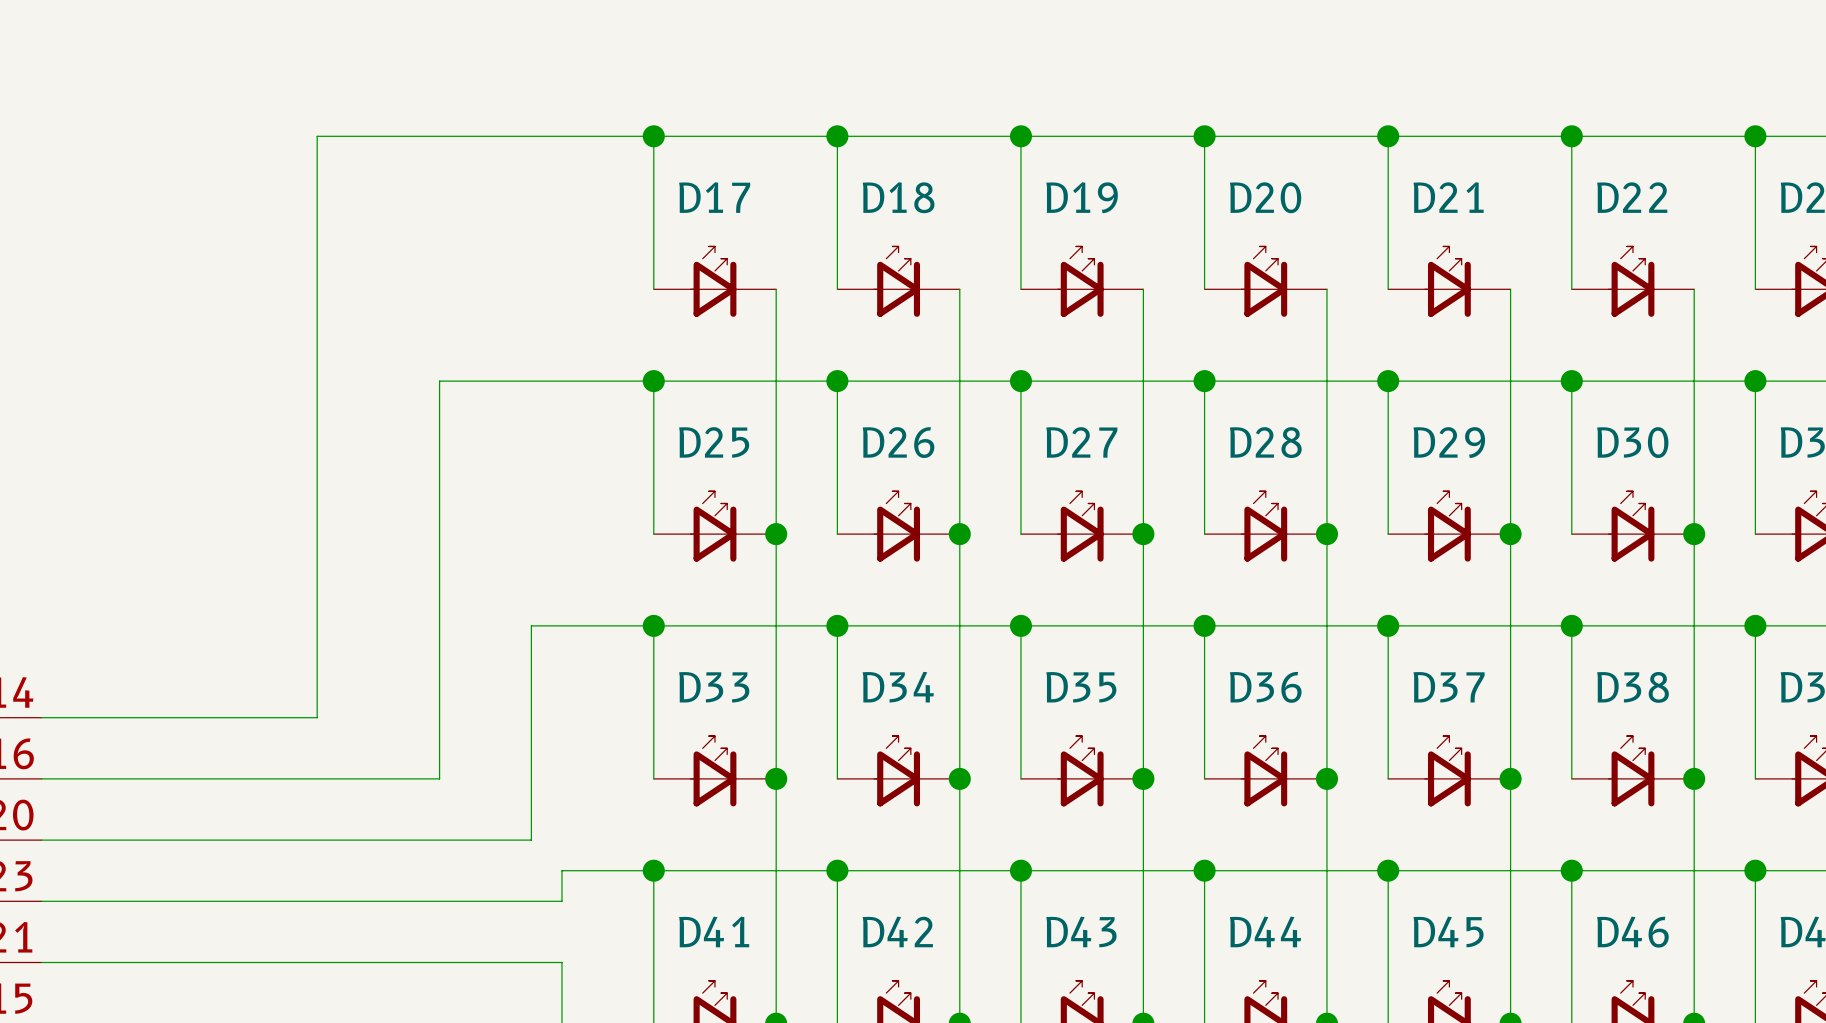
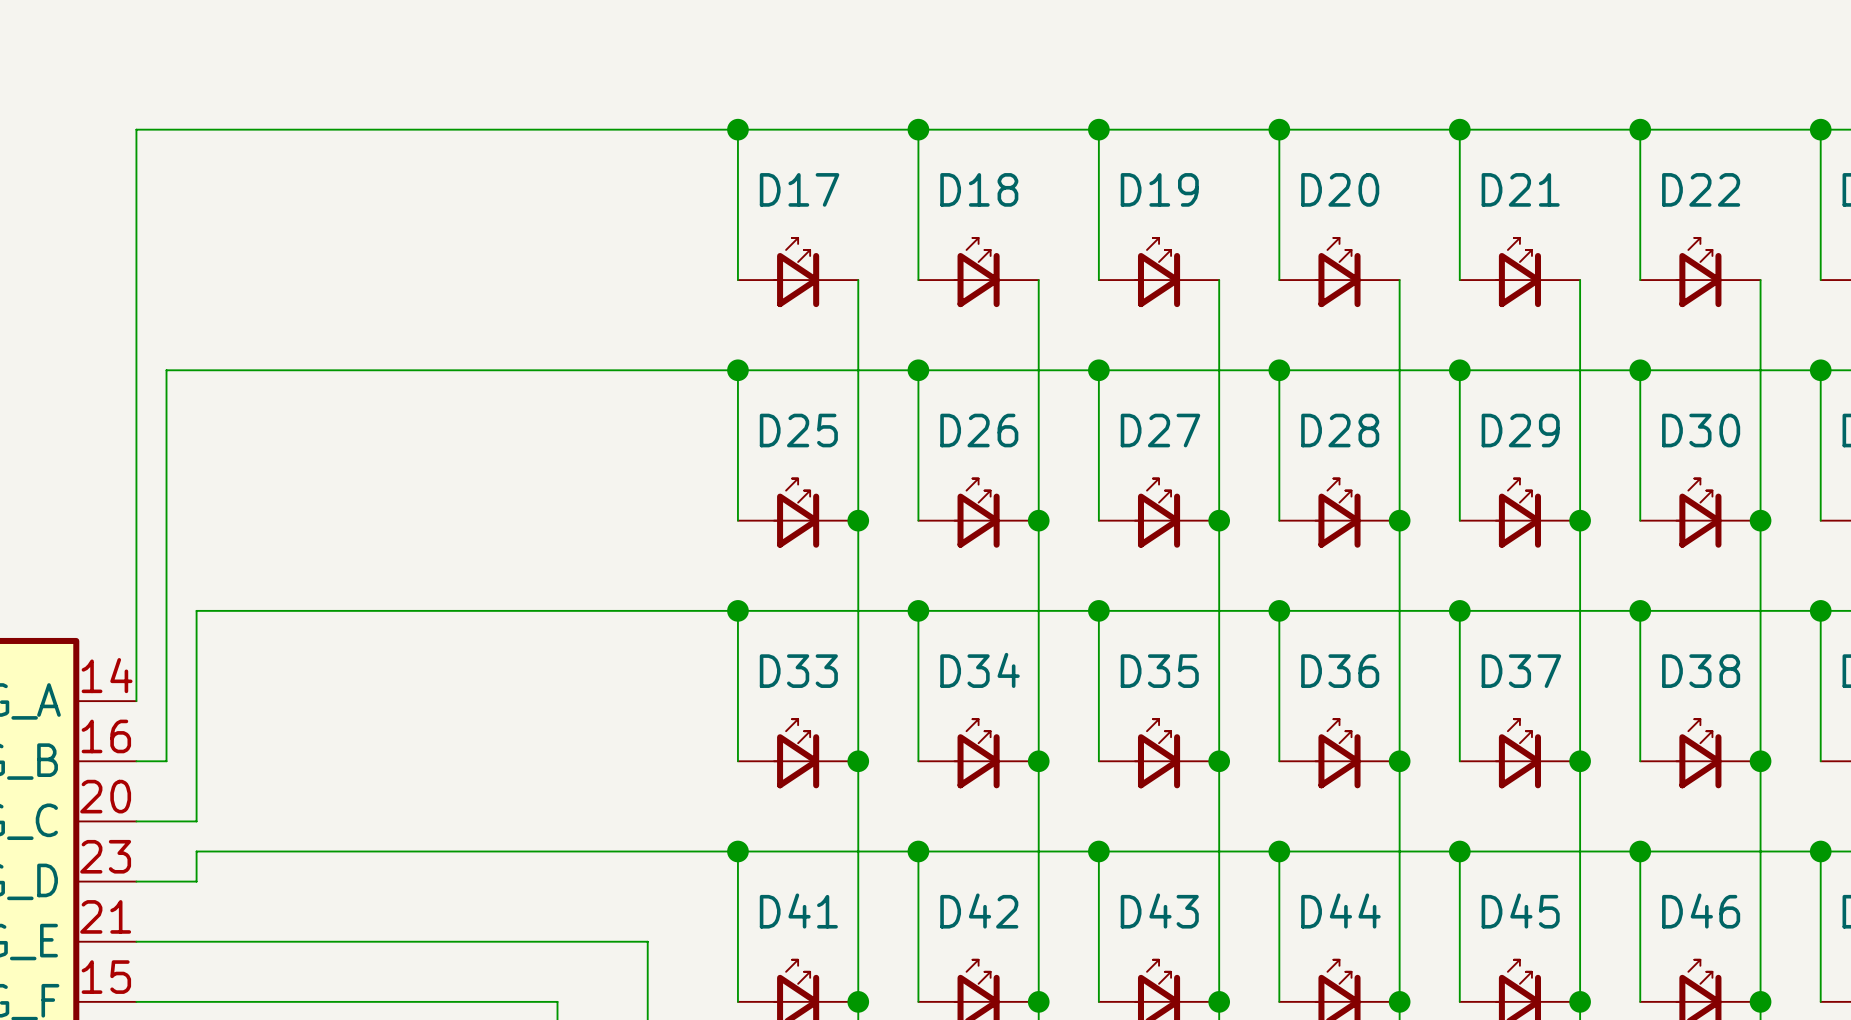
wire: (317, 136) (317, 717) (41, 717) -> (407, 129) (136, 129) (136, 701)
wire: (439, 381) (439, 778) (72, 778) -> (527, 370) (166, 370) (166, 761)
wire: (531, 625) (531, 840) (102, 840) -> (617, 610) (196, 610) (196, 821)
wire: (561, 870) (561, 901) (102, 901) -> (647, 851) (196, 851) (196, 881)

